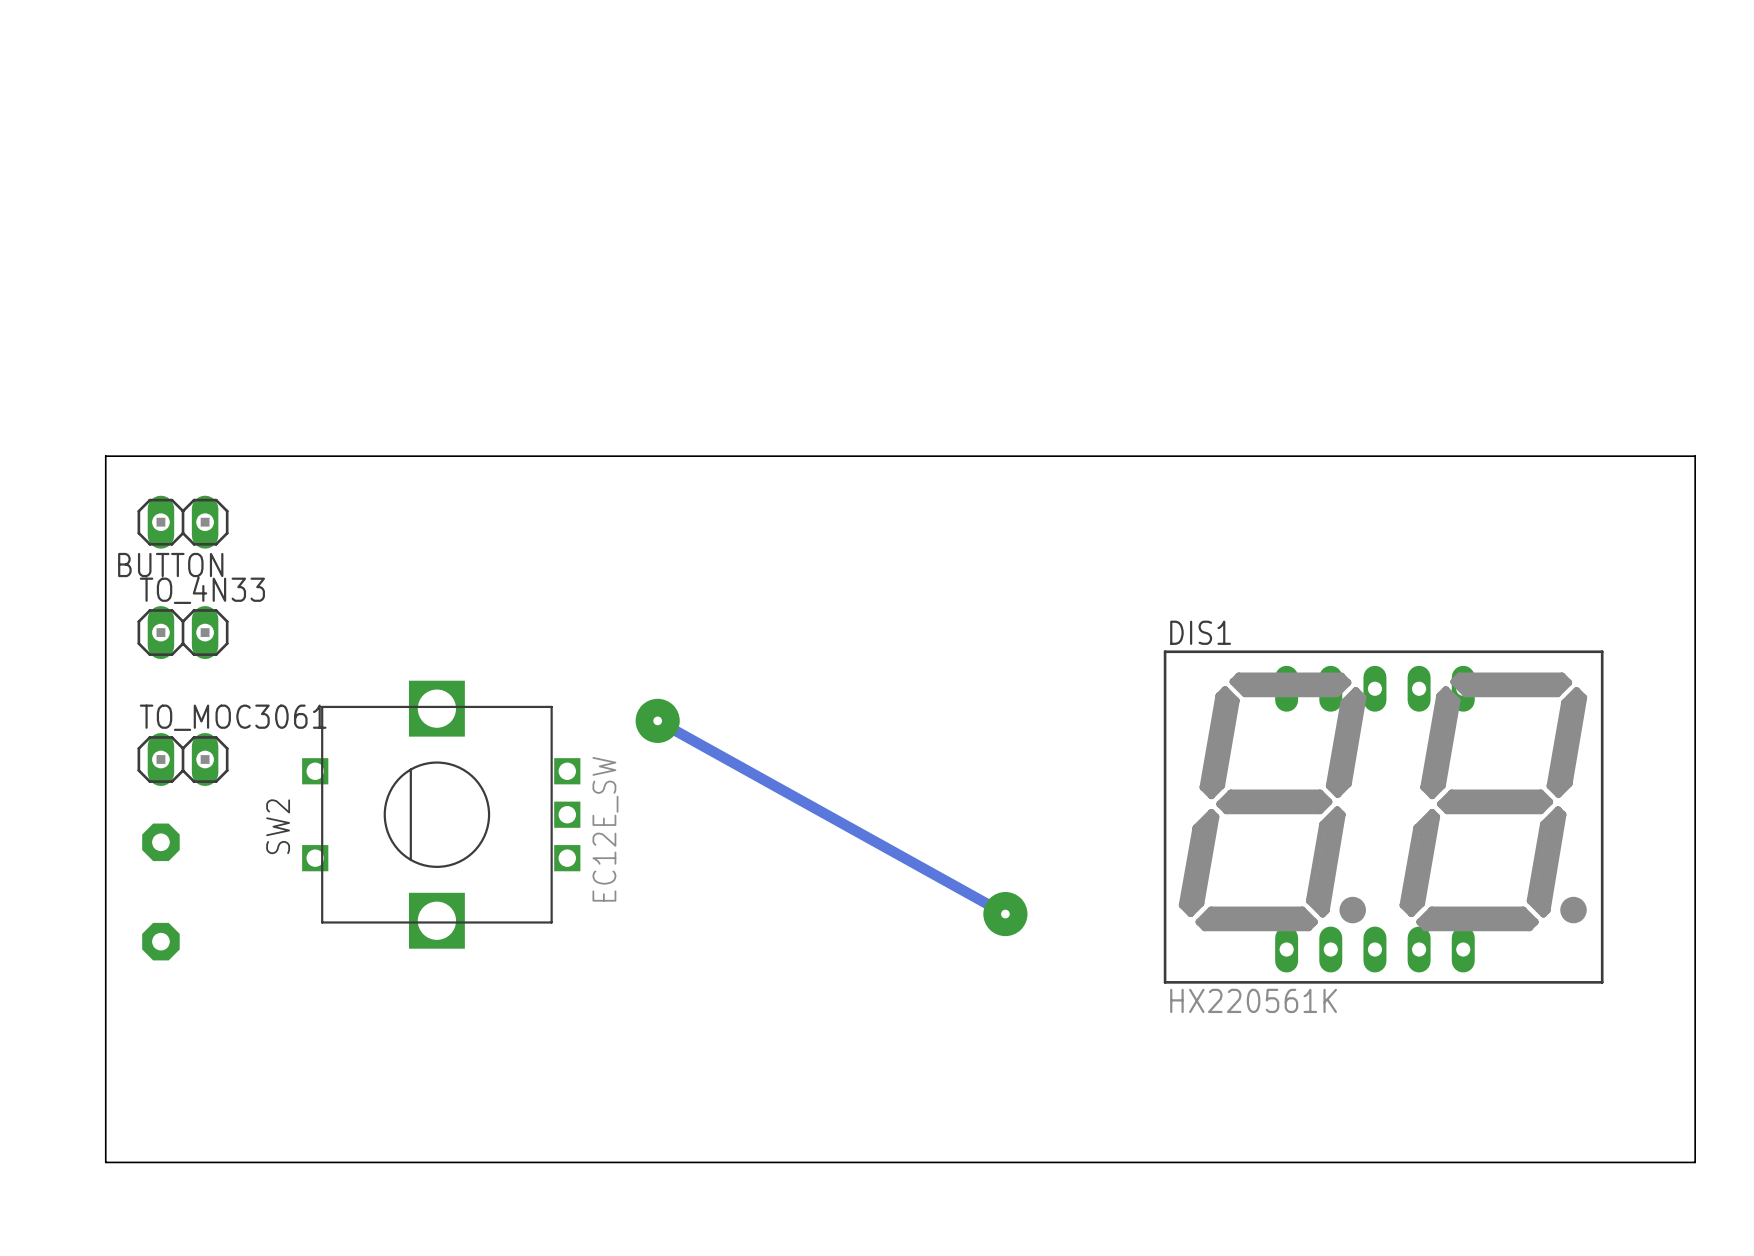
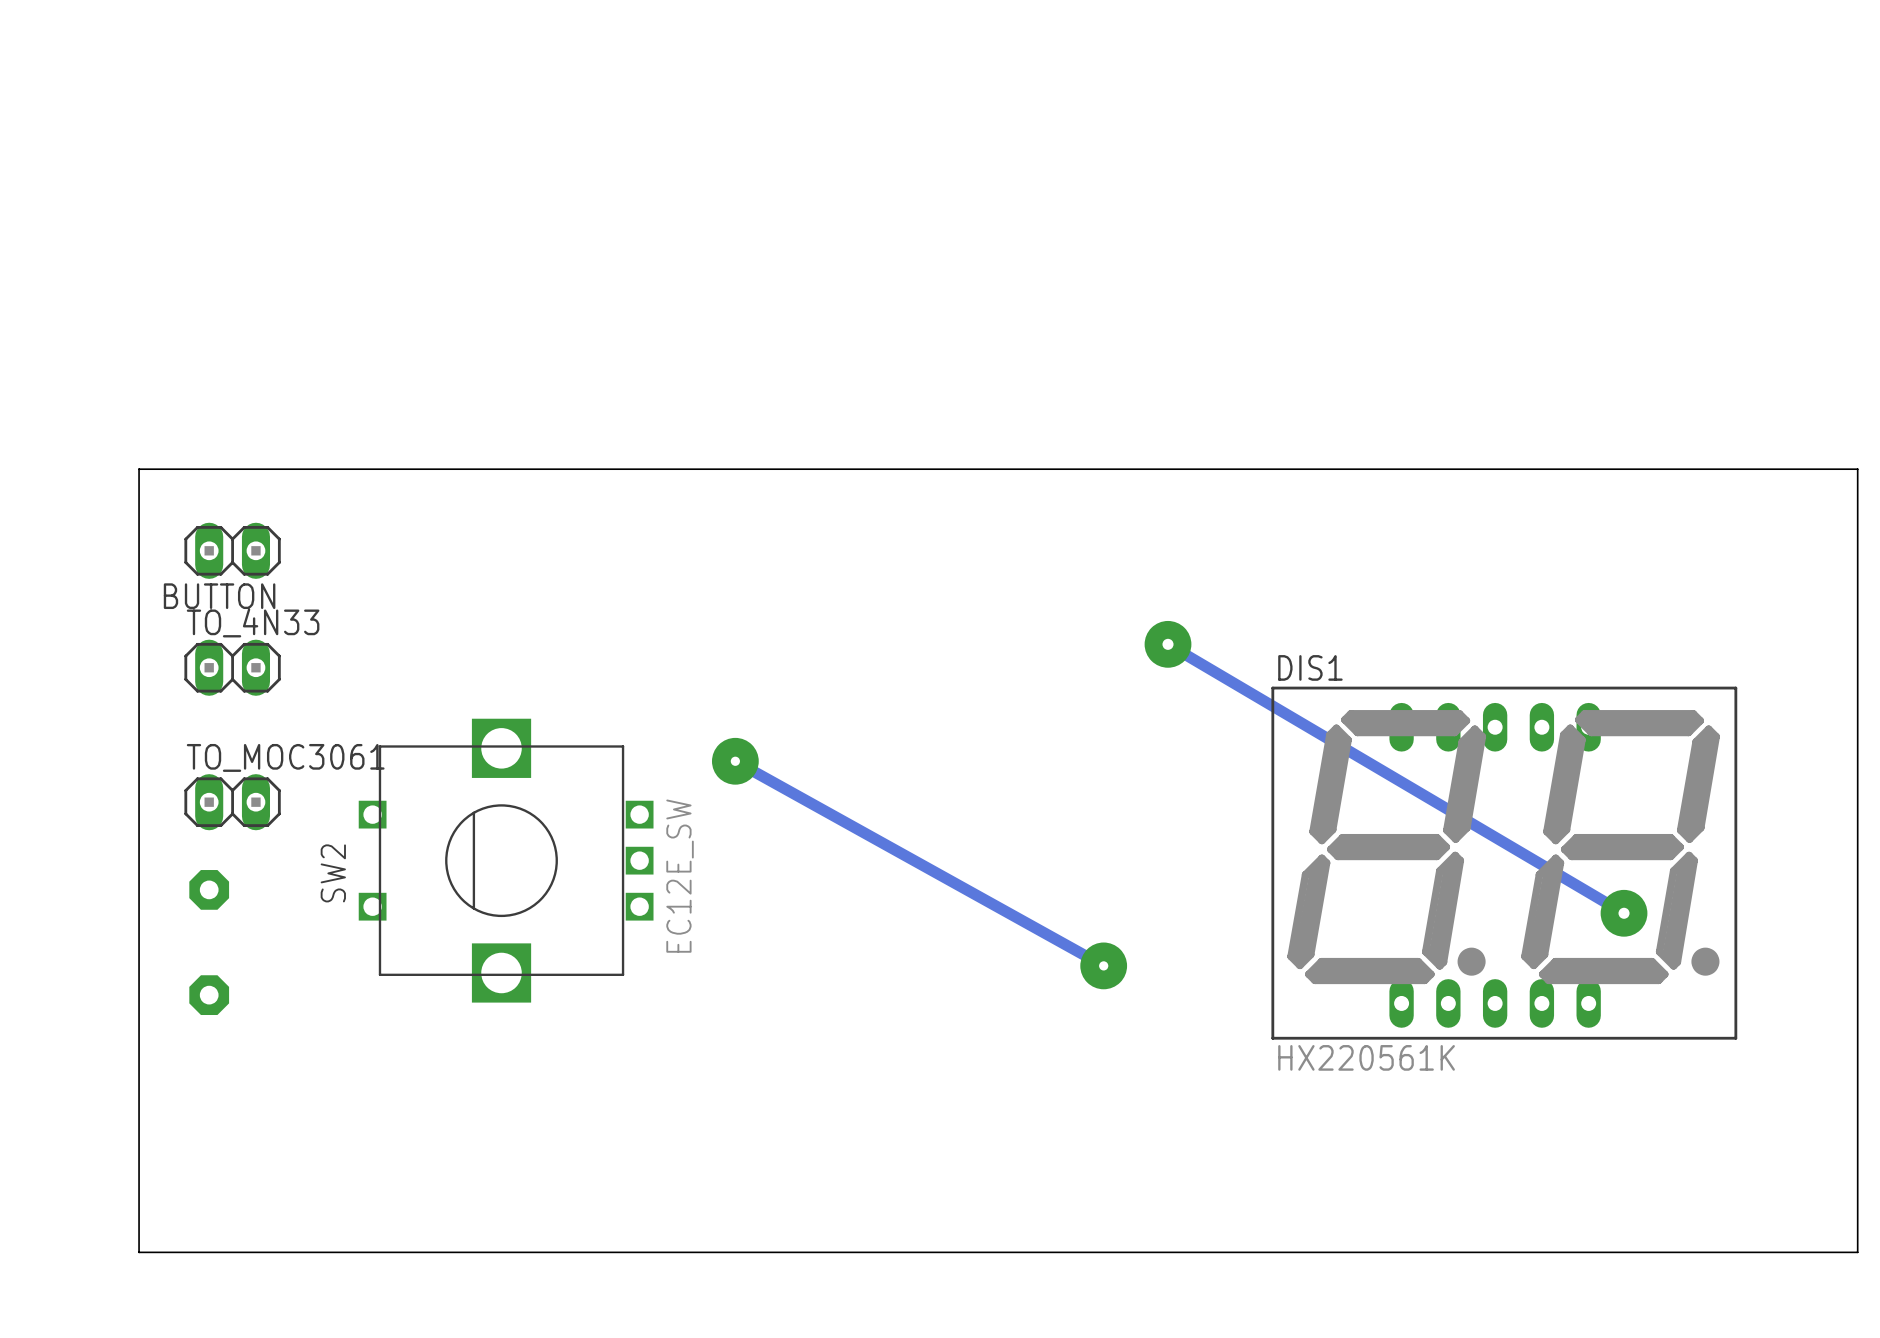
board edge: (1695, 456) (105, 456) (105, 1162) (1695, 1162) (1695, 456) -> (1857, 469) (1857, 1252) (139, 1252) (139, 469) (1857, 469)
track: none -> (1168, 644) (1624, 913)
via: none -> (1168, 644)
via: none -> (1624, 913)

